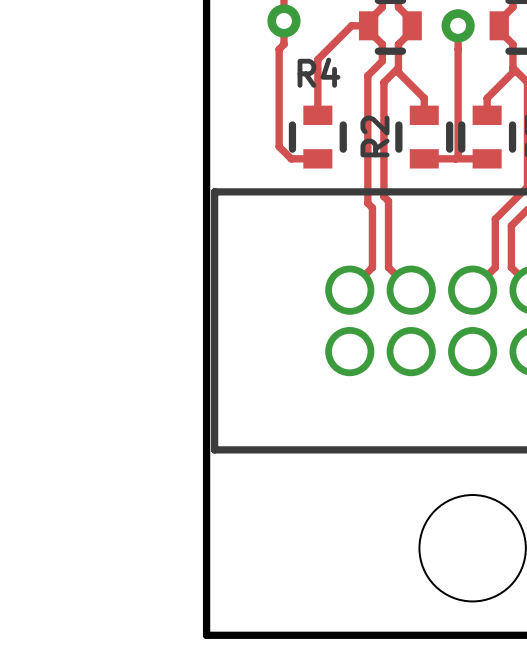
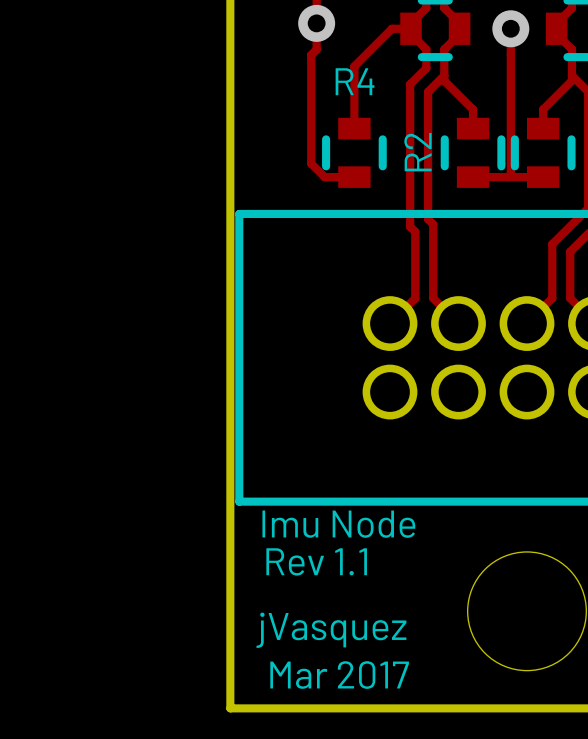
text: none -> Imu Node (338, 524)
text: none -> Rev 1.1 (316, 561)
text: none -> jVasquez (331, 630)
text: none -> Mar 2017 (339, 675)

